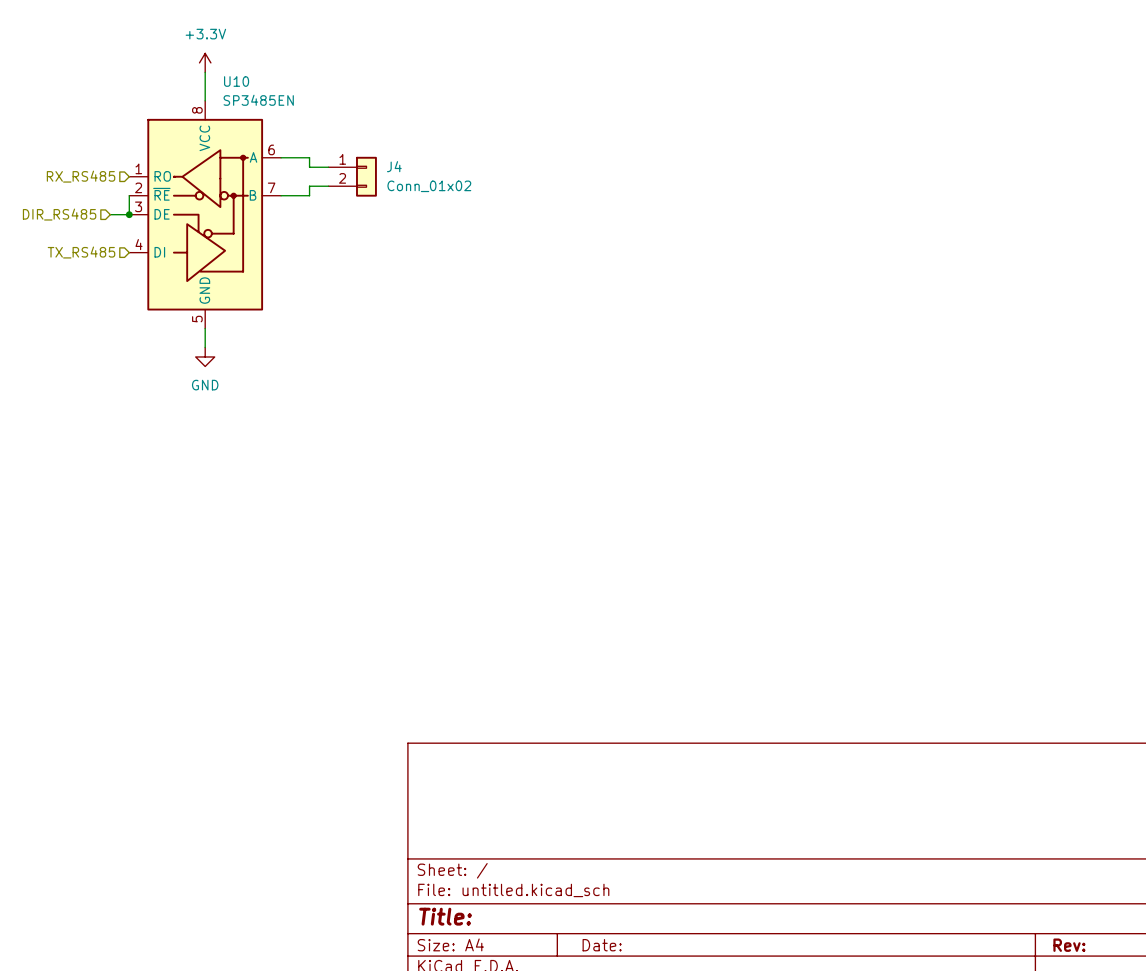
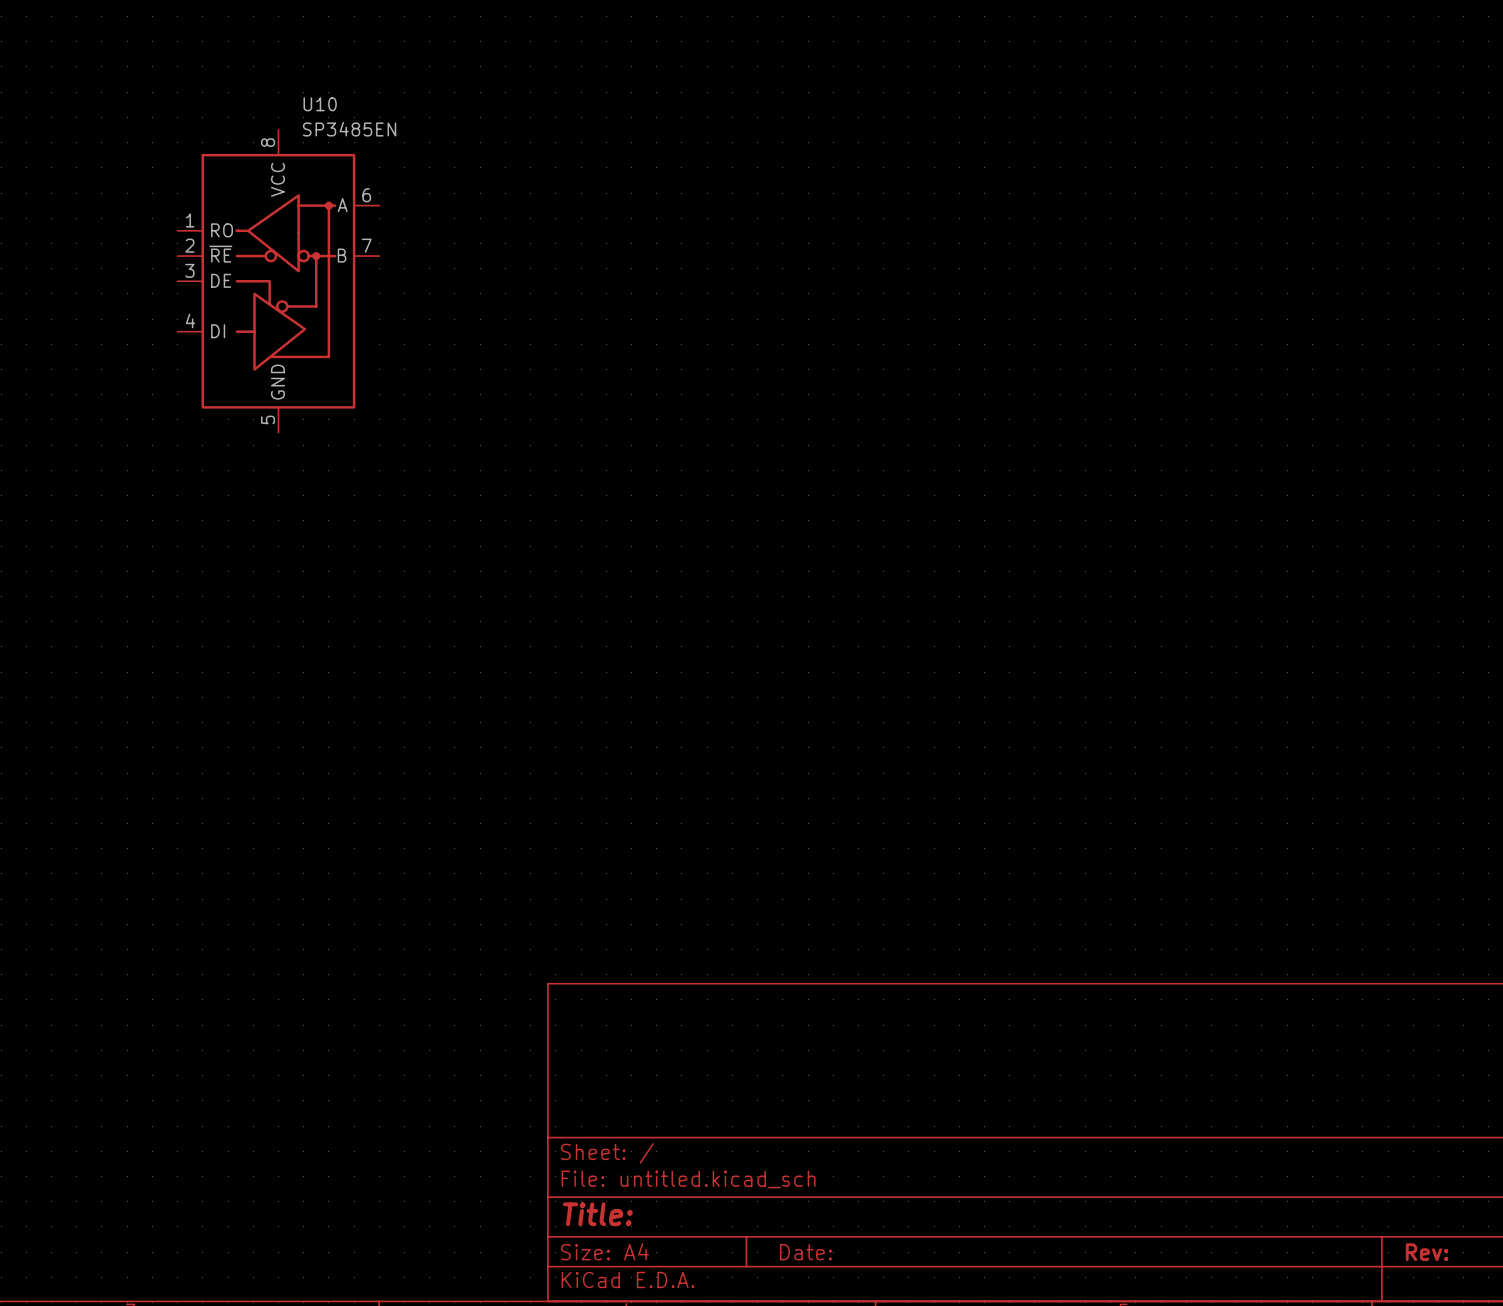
power symbol: +3.3V (205, 62) -> none
wire: (205, 72) (205, 100) -> none
wire: (281, 157) (309, 157) (309, 167) (328, 167) -> none
hierarchical label: RX_RS485 (81, 176) -> none
J4: Conn_01x02 (352, 176) -> none
wire: (328, 186) (309, 186) (309, 195) (281, 195) -> none
wire: (129, 195) (129, 214) (110, 214) -> none
hierarchical label: DIR_RS485 (59, 214) -> none
junction: (129, 214) -> none
hierarchical label: TX_RS485 (81, 252) -> none
wire: (205, 328) (205, 347) -> none
power symbol: GND (205, 356) -> none

